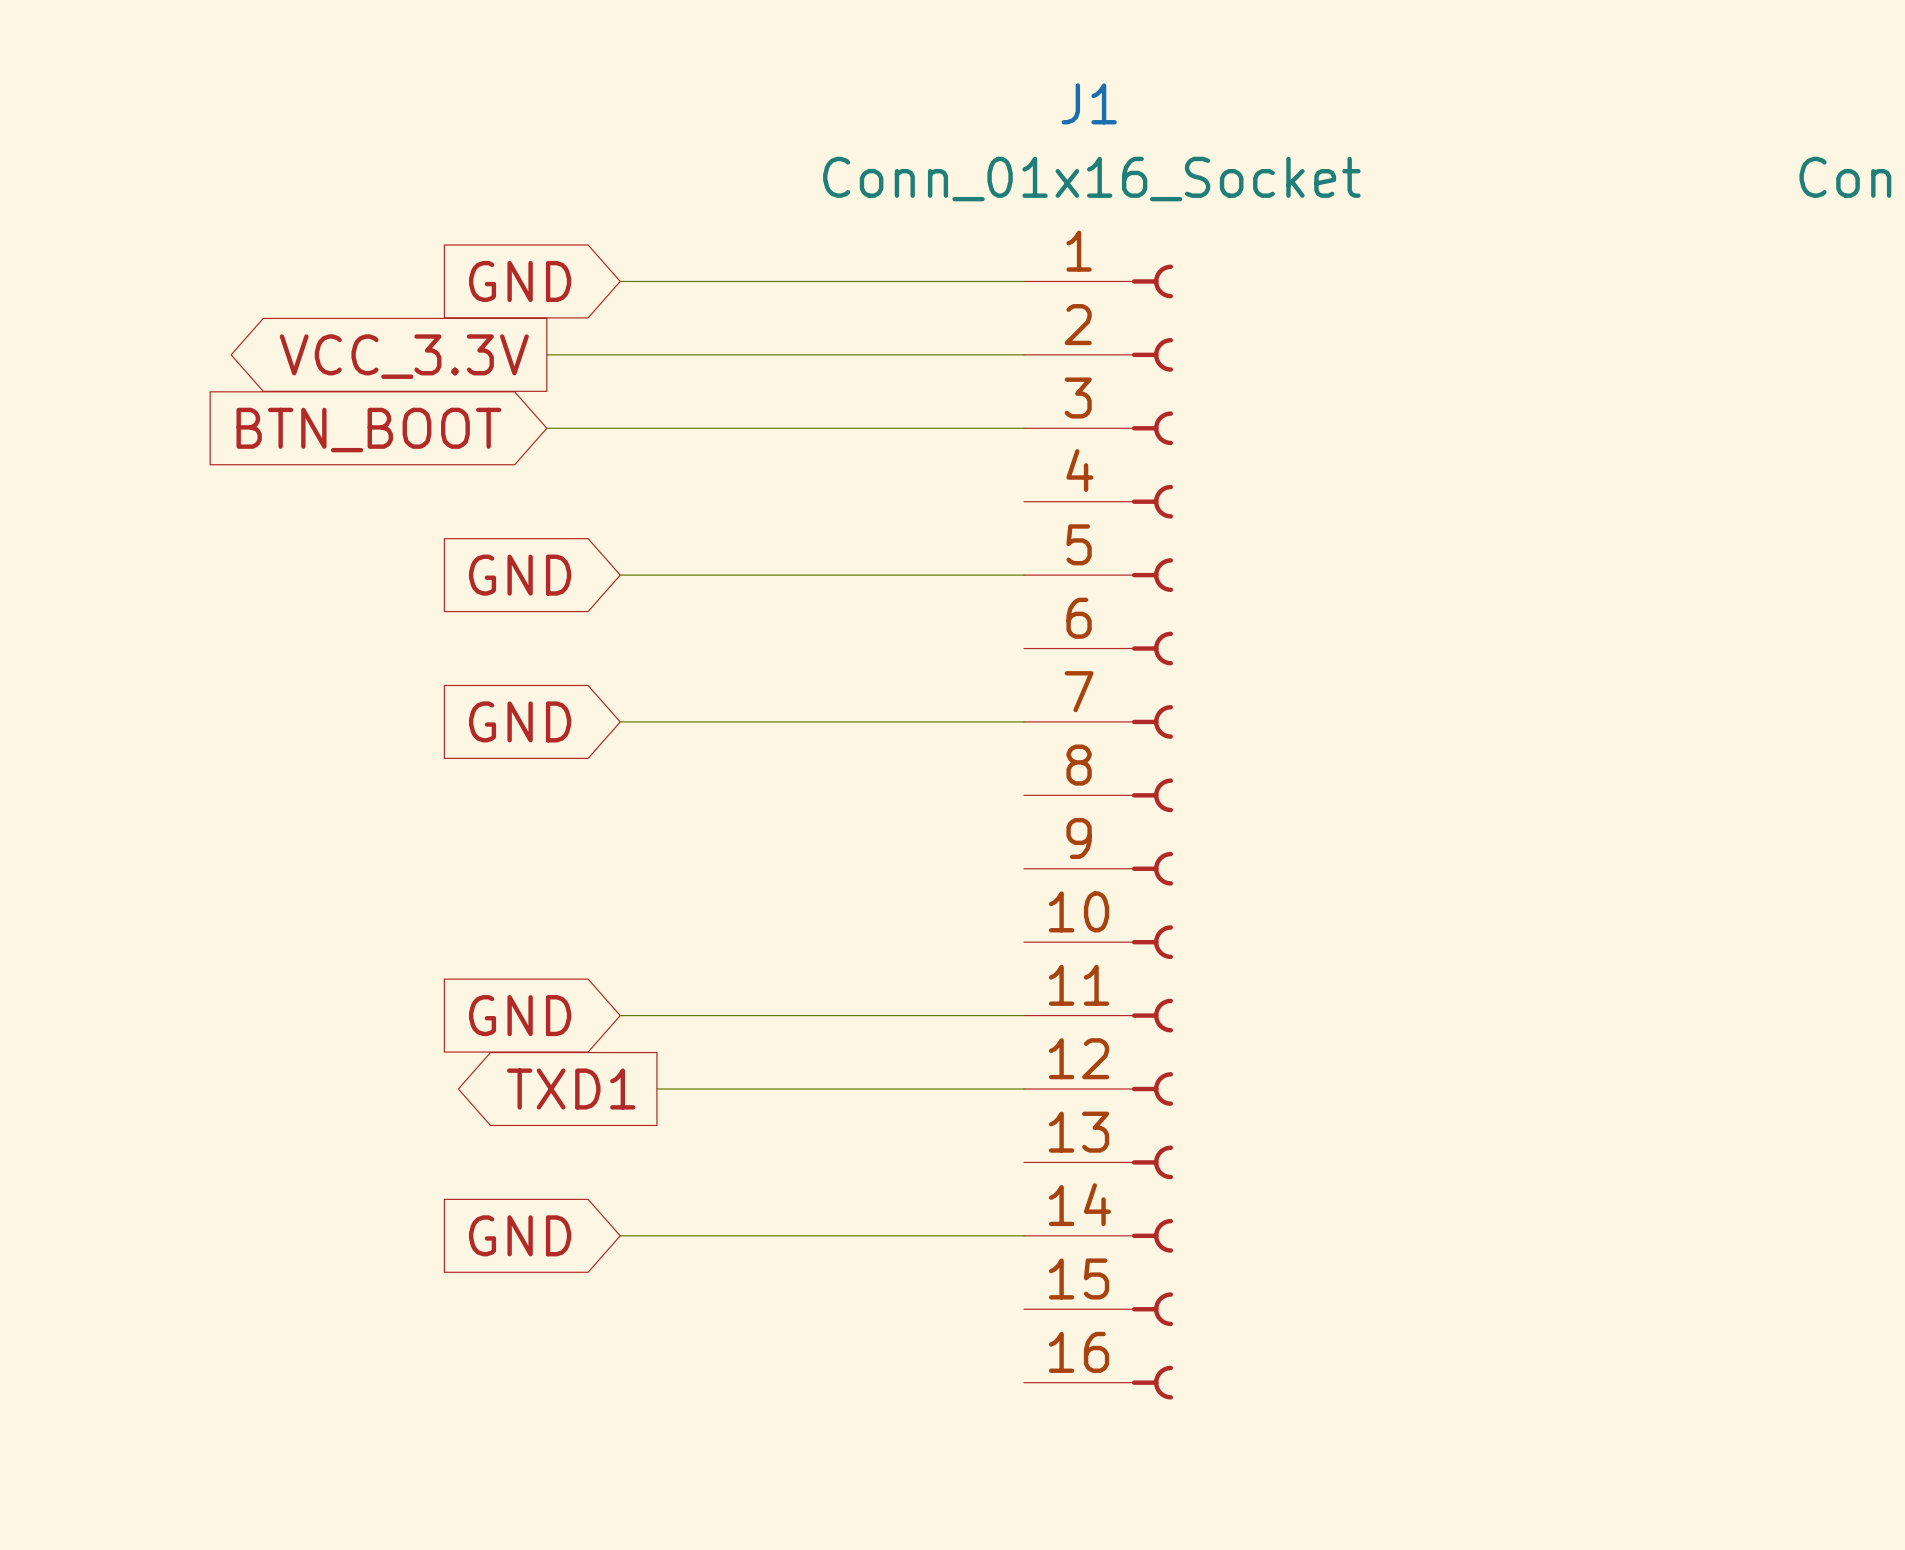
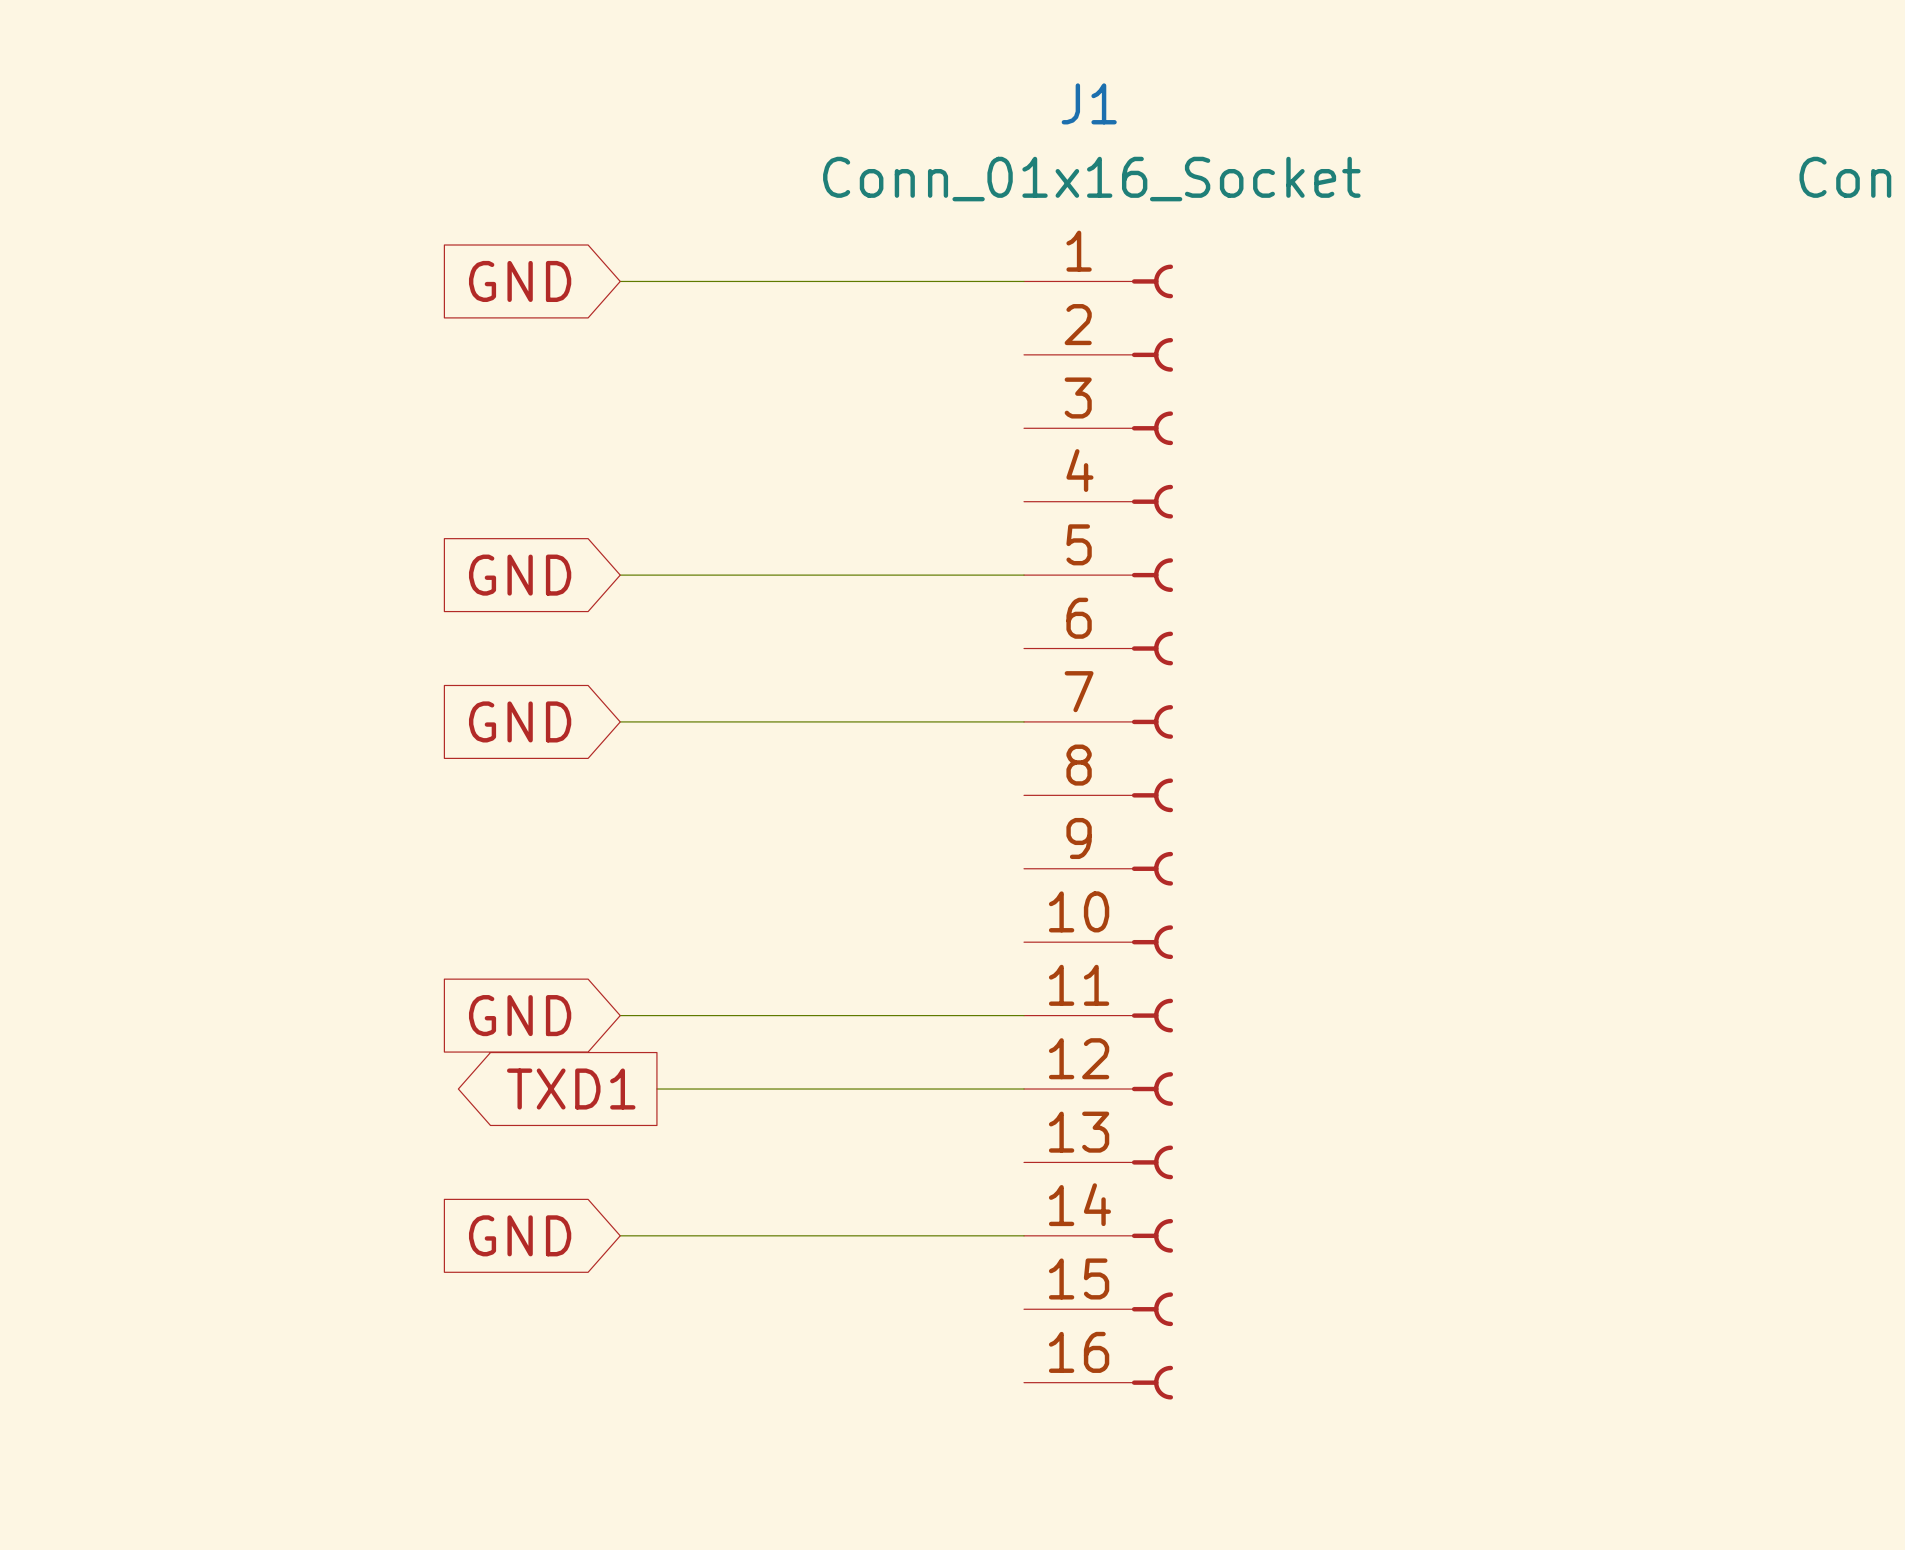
wire: (546, 354) (1024, 354) -> none
global label: VCC_3.3V (404, 356) -> none
wire: (546, 428) (1024, 428) -> none
global label: BTN_BOOT (368, 430) -> none

